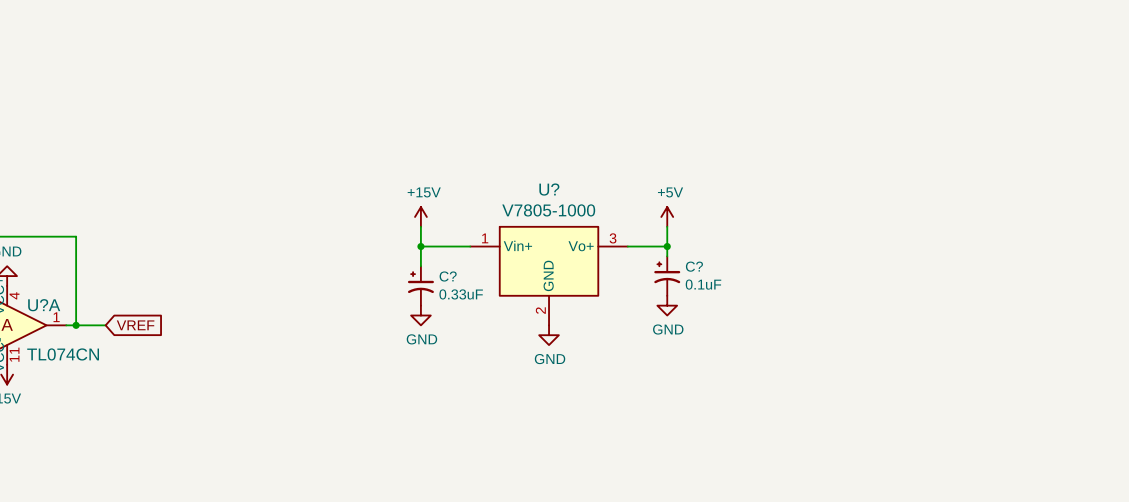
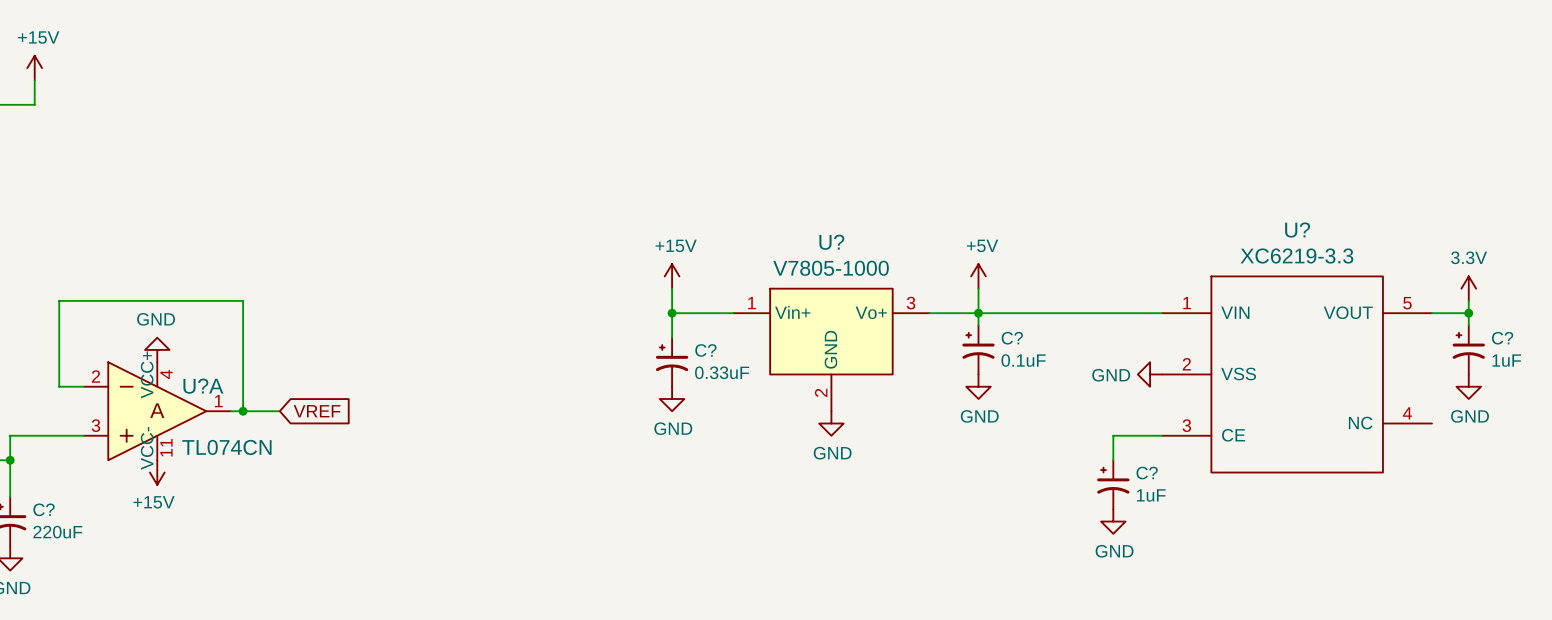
power symbol: none -> 3.3V (1468, 288)
wire: none -> (1468, 300) (1468, 325)
wire: none -> (978, 313) (1162, 313)
wire: none -> (1432, 313) (1468, 313)
junction: none -> (1468, 313)
C?: none -> 1uF (1468, 349)
power symbol: none -> GND (1150, 374)
U?: none -> XC6219-3.3 (1297, 374)
power symbol: none -> GND (1468, 386)
wire: none -> (1162, 435) (1113, 435) (1113, 460)
C?: none -> 1uF (1113, 484)
power symbol: none -> GND (1113, 521)

